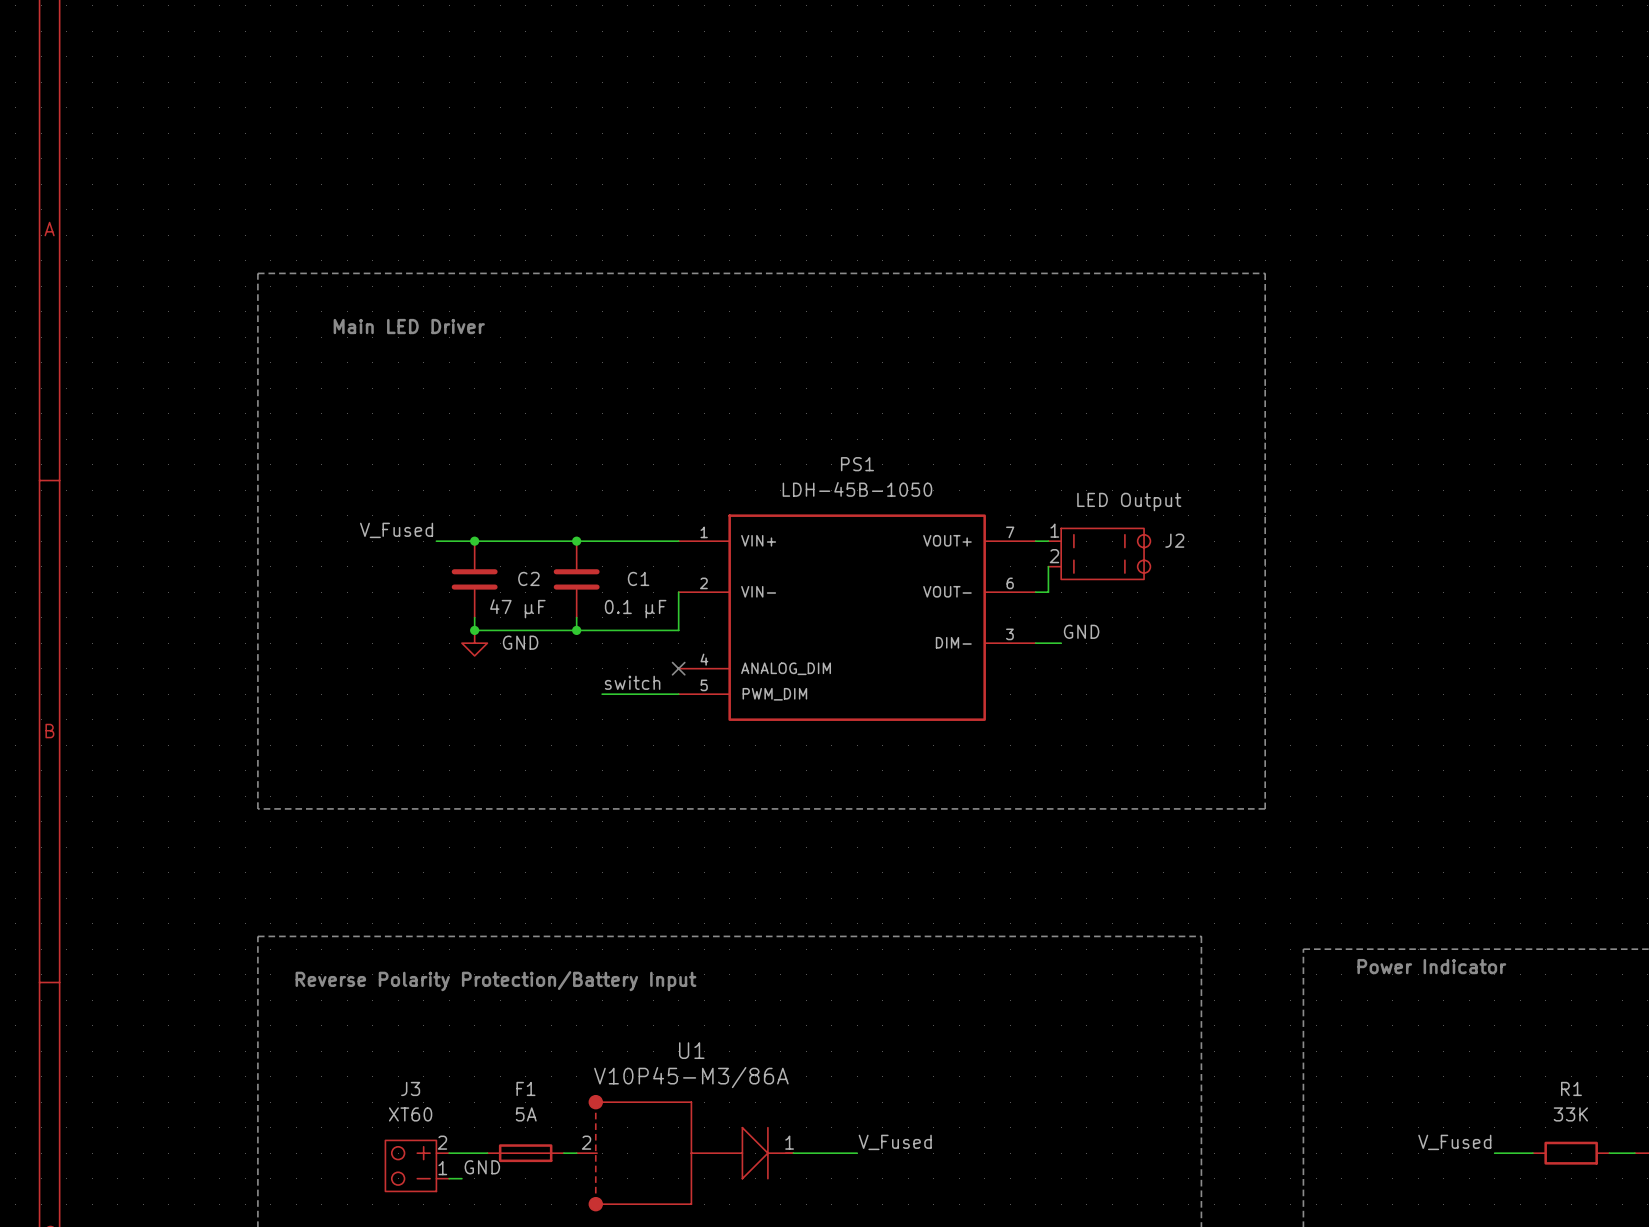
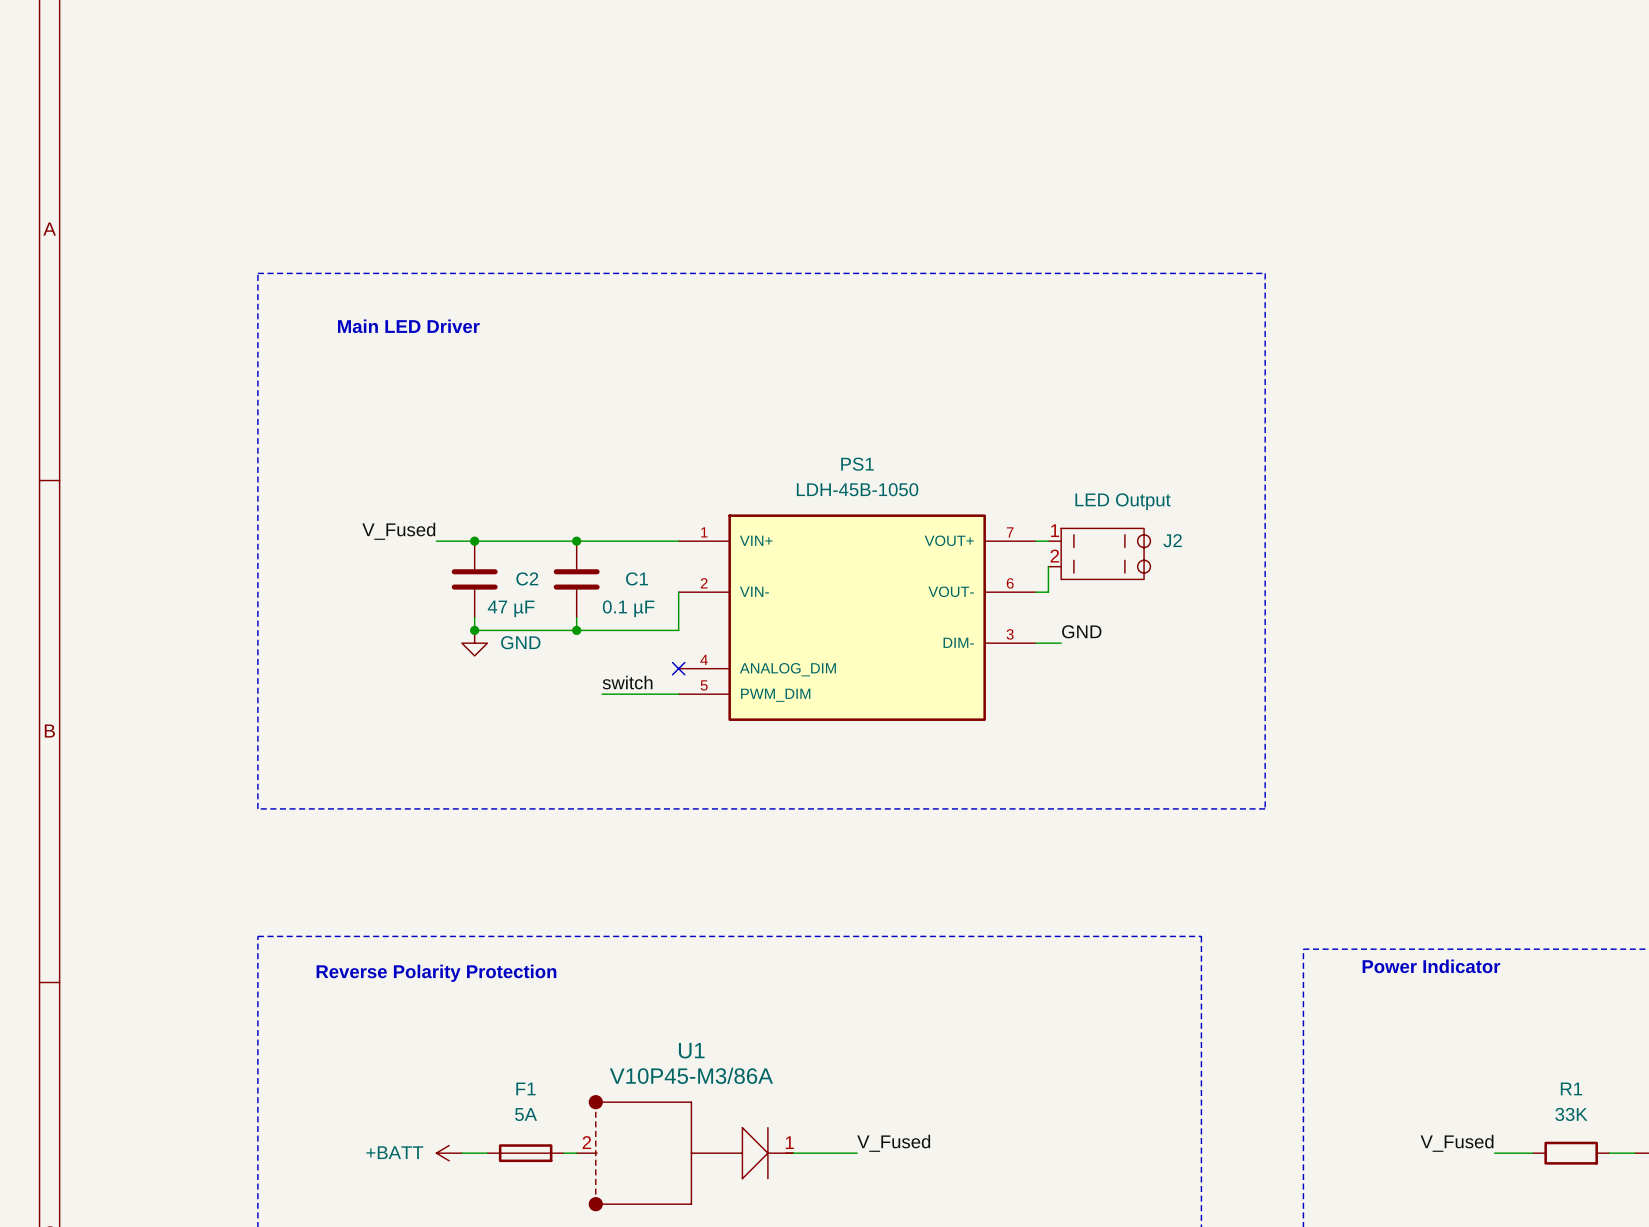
text: Reverse Polarity Protection/Battery Input (495, 981) -> Reverse Polarity Protection (436, 973)
power symbol: none -> +BATT (449, 1153)
J3: XT60 (417, 1165) -> none
label: GND (482, 1167) -> none
wire: (449, 1178) (461, 1178) -> none

